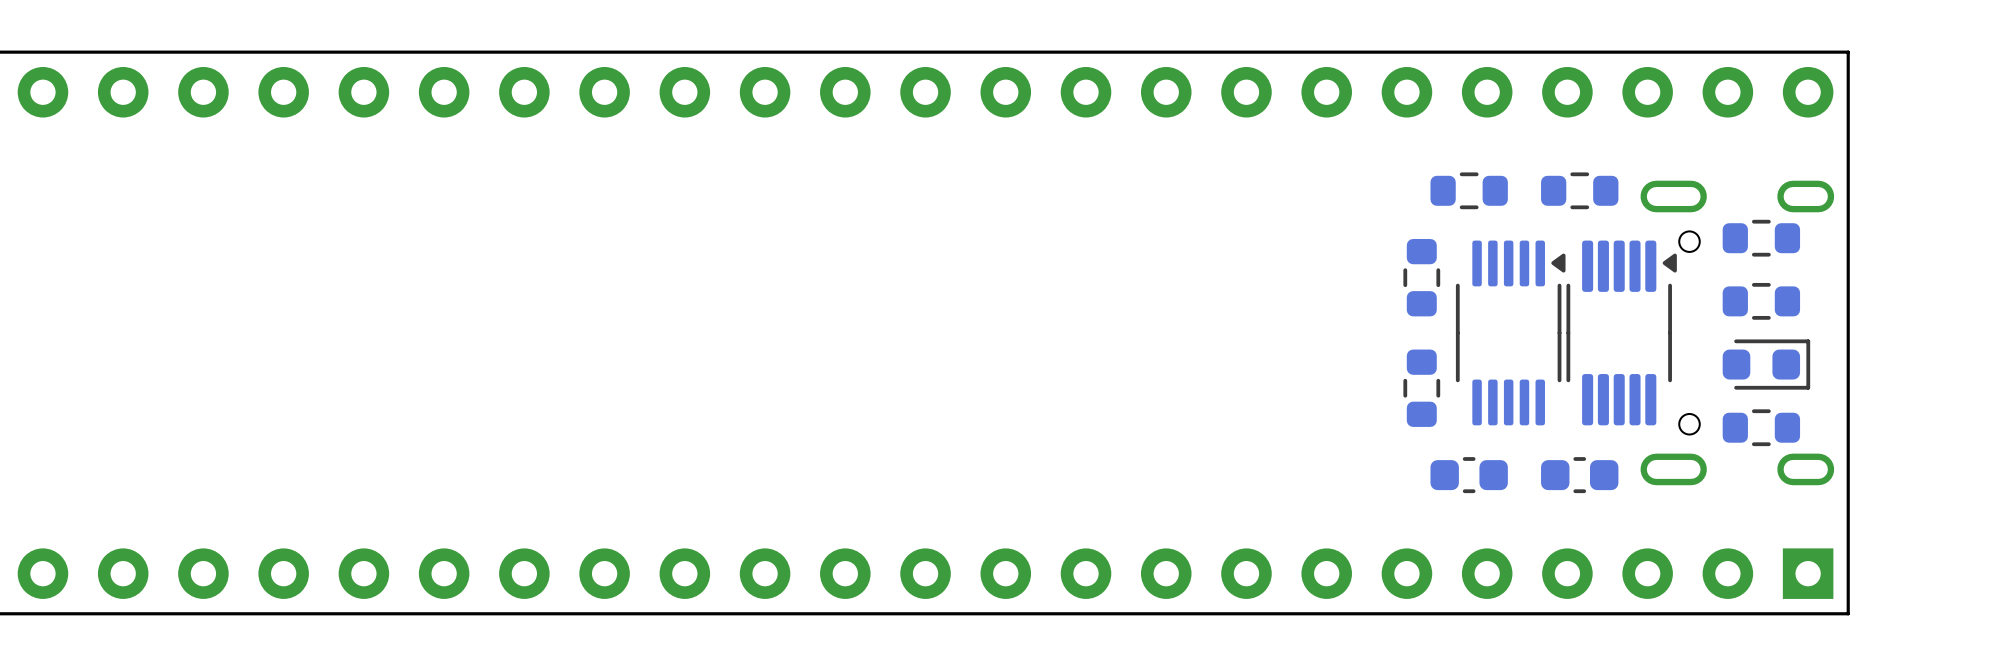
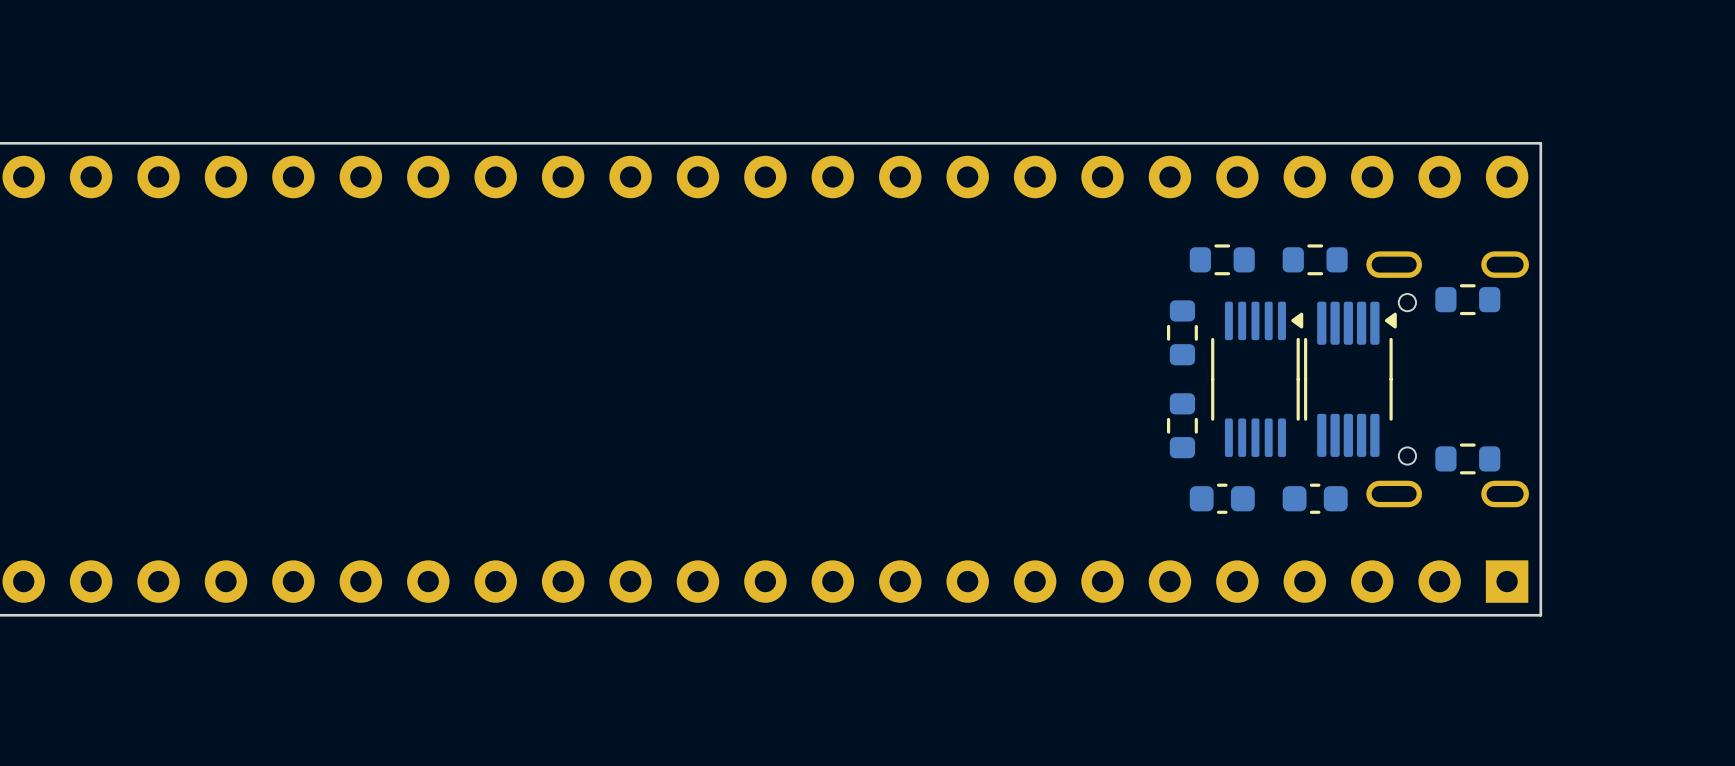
part: (1761, 301) -> none
part: (1766, 364) -> none

